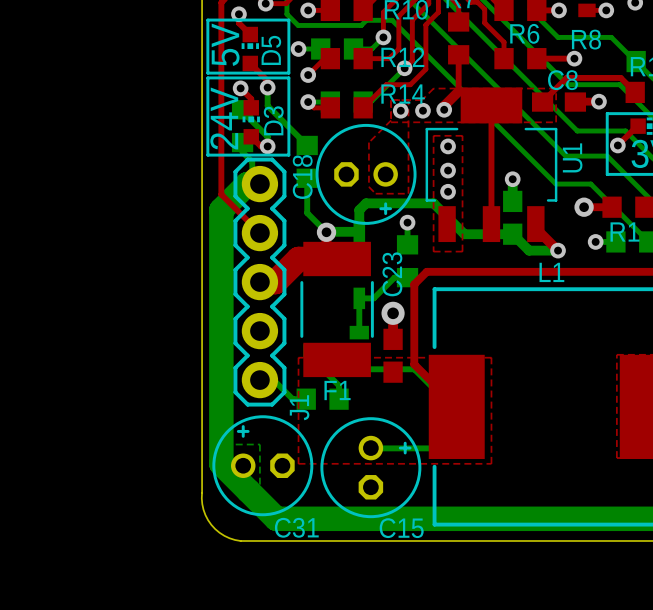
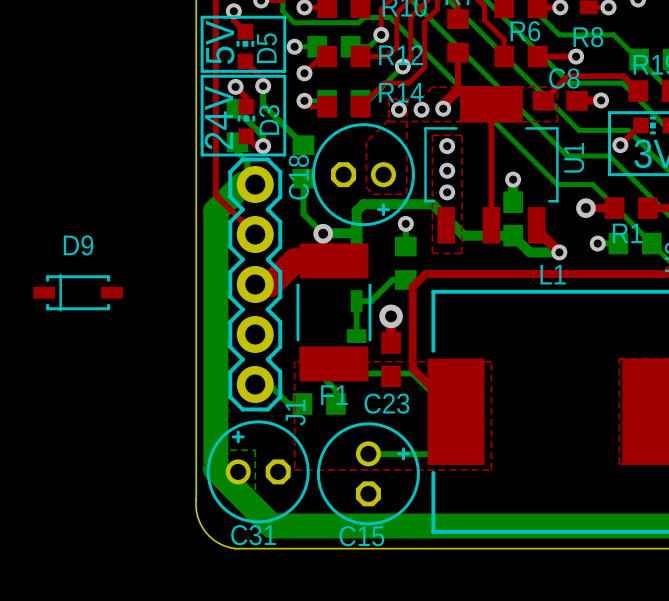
C23 name rotation: 0° (392, 274) -> 90° clockwise (386, 403)
C23 name position: C23 (392, 274) -> C23 (386, 403)
D9: none -> (78, 292)
C31 name position: C31 (296, 527) -> C31 (253, 535)
C15 name position: C15 (401, 528) -> C15 (361, 536)

